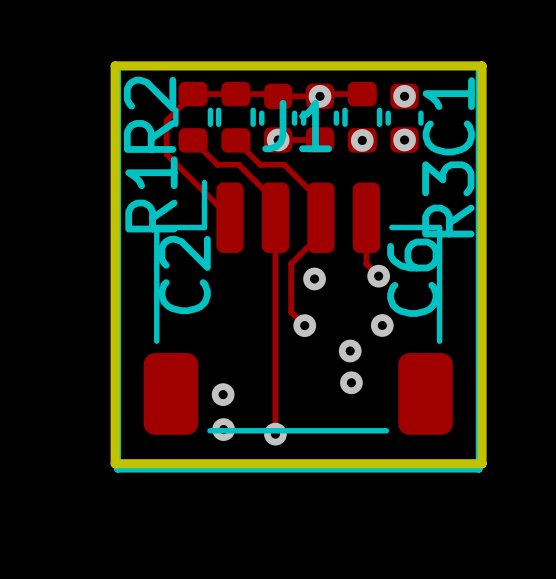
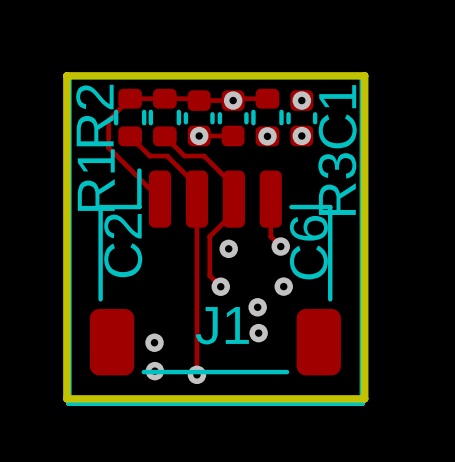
J1 name position: J1 (297, 126) -> J1 (222, 325)

